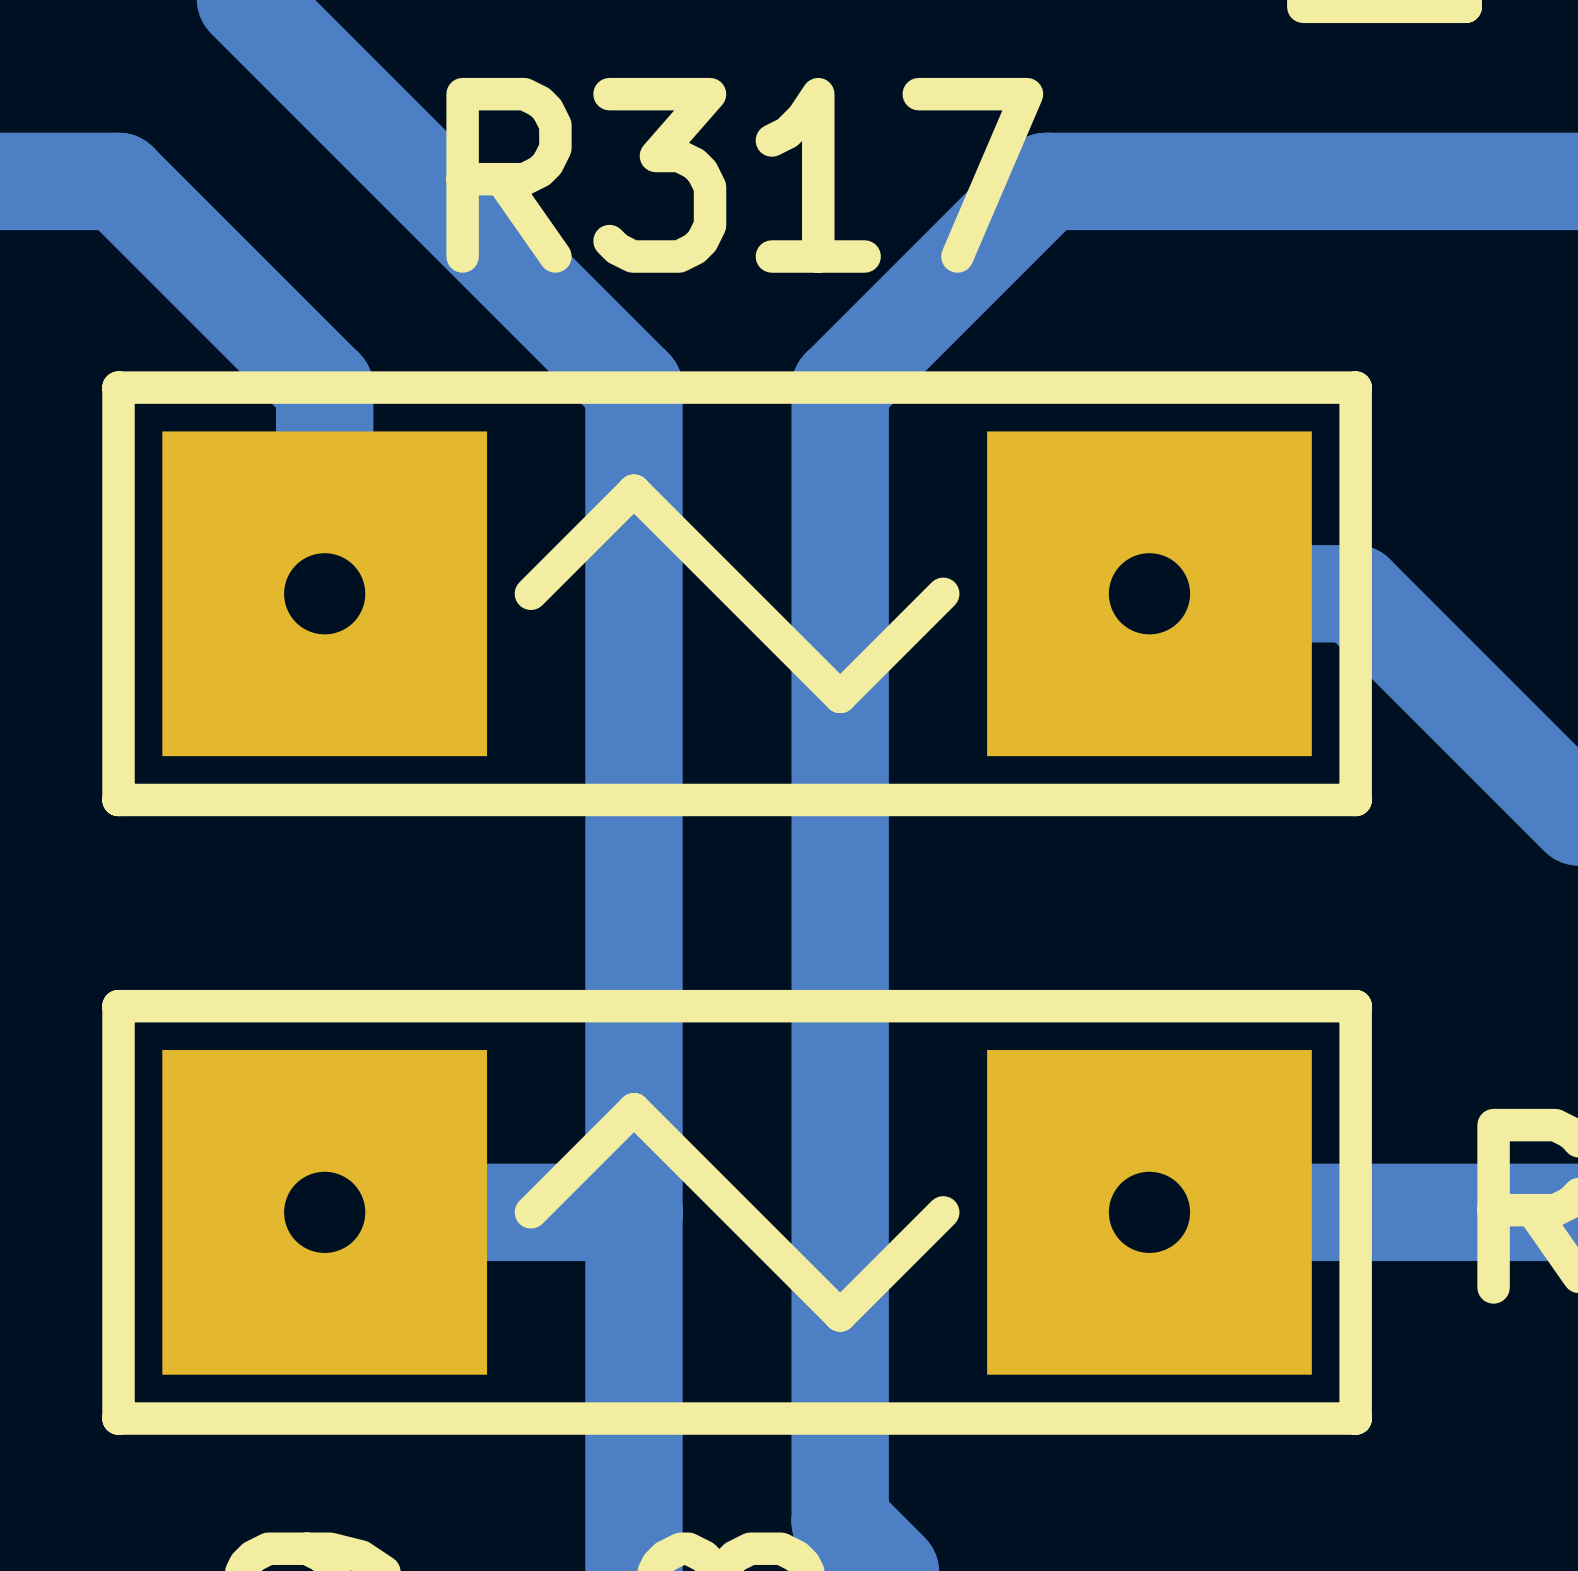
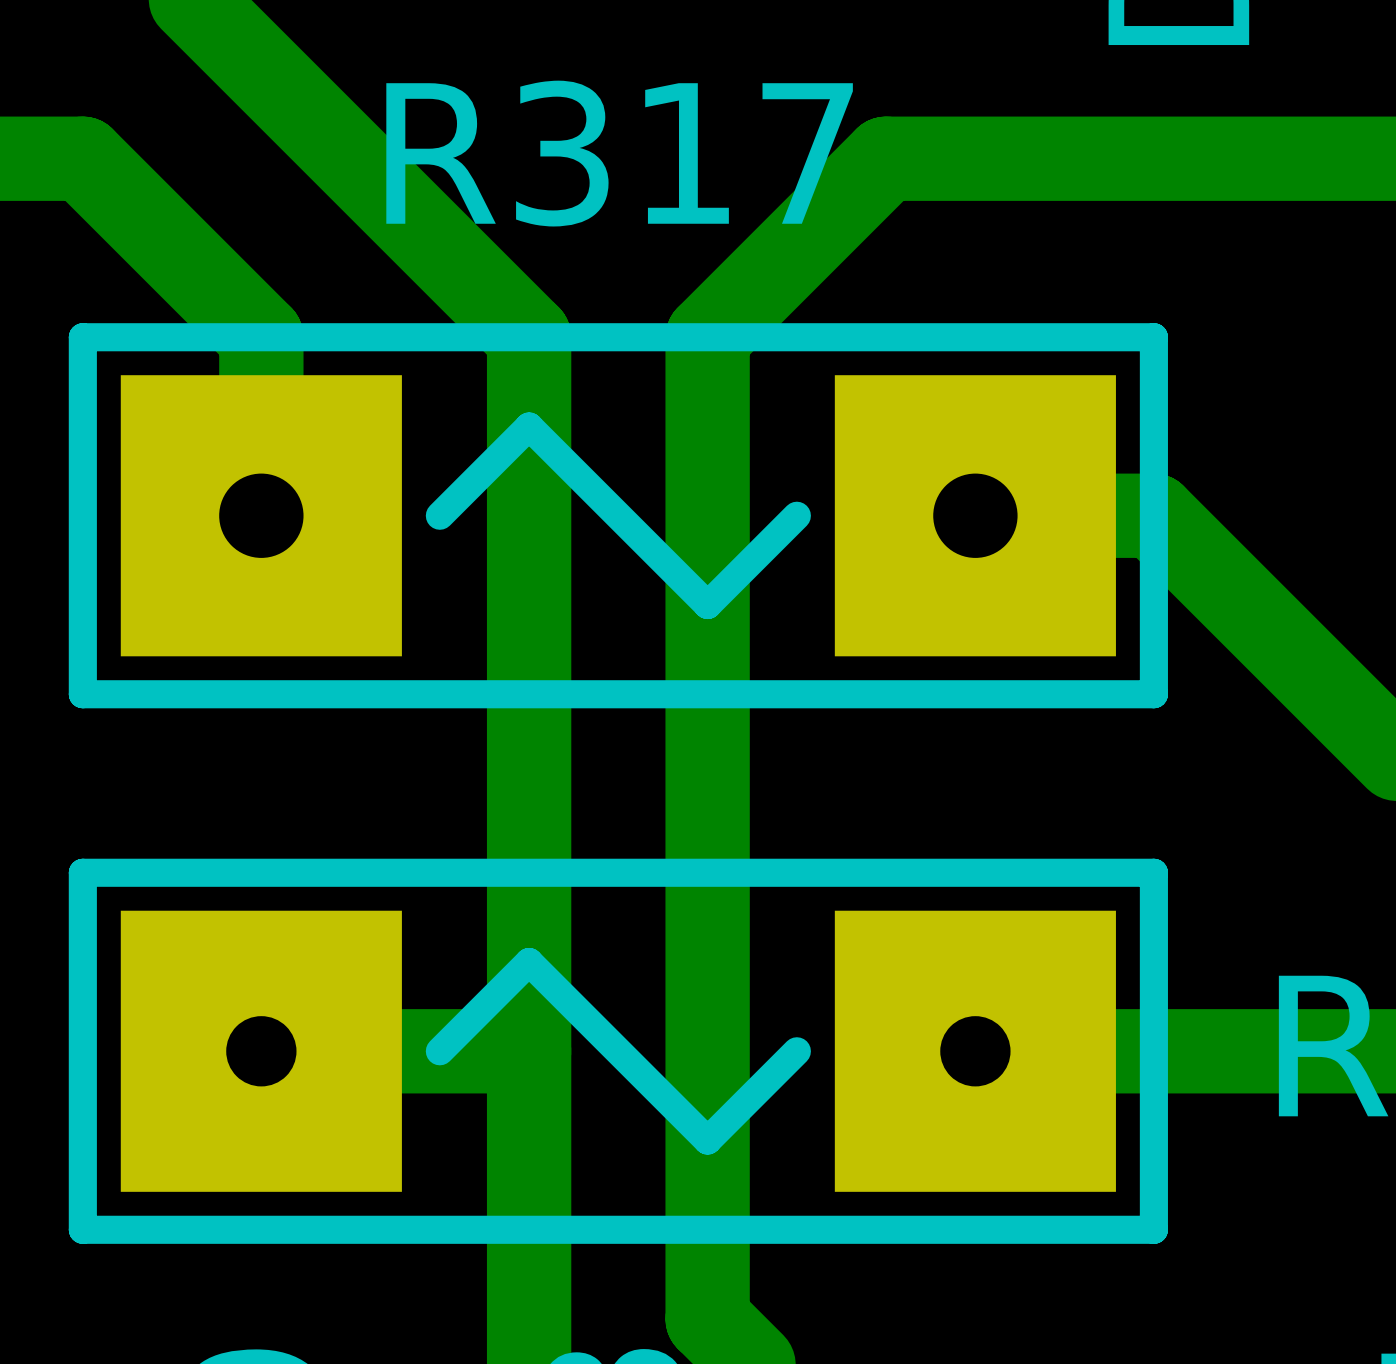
R317 footprint: [102, 371, 1372, 817] -> [68, 323, 1168, 709]

